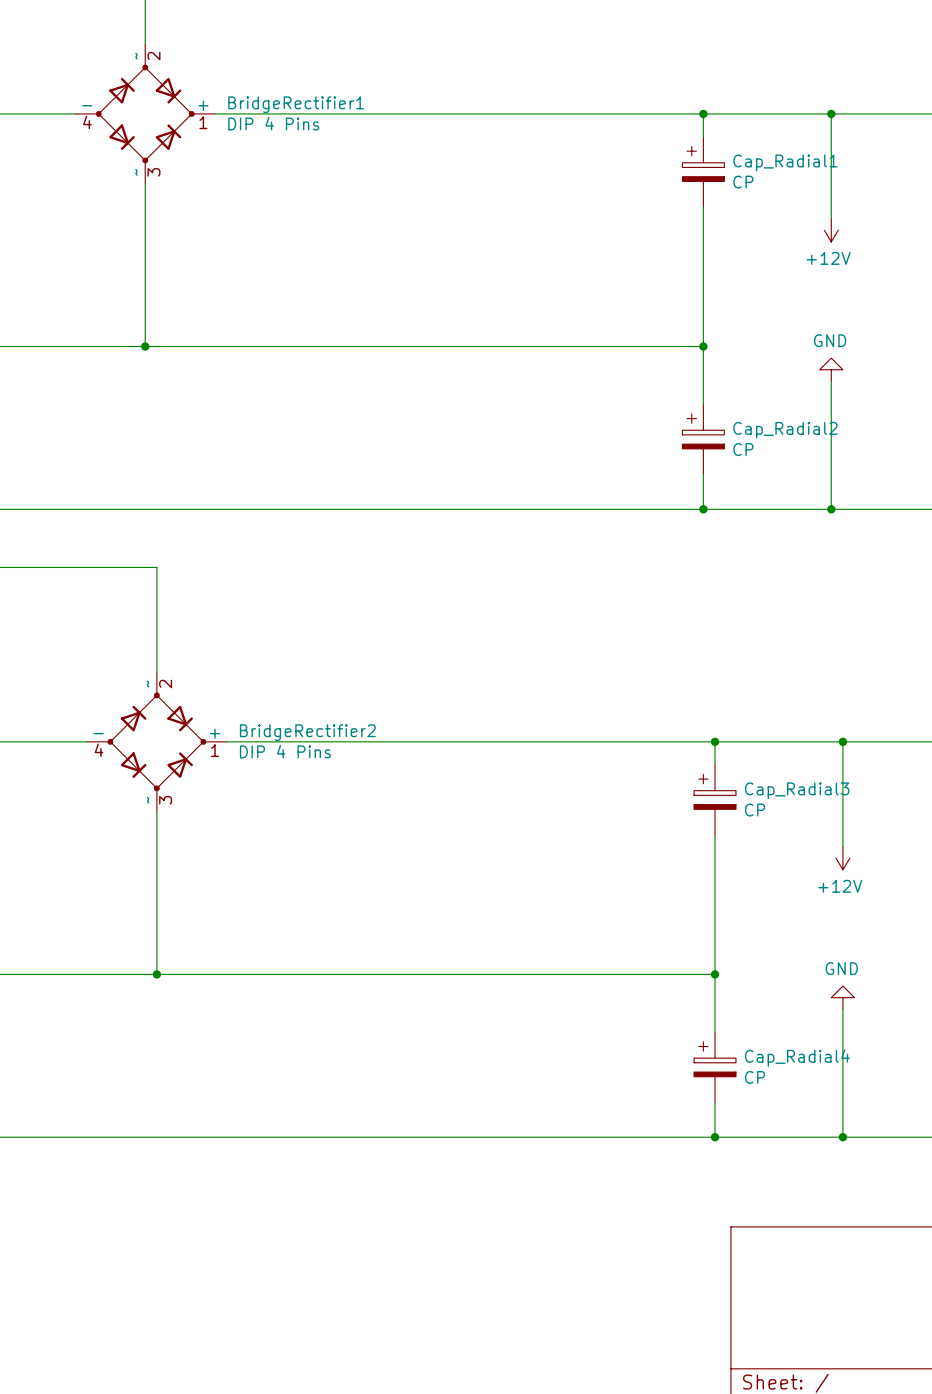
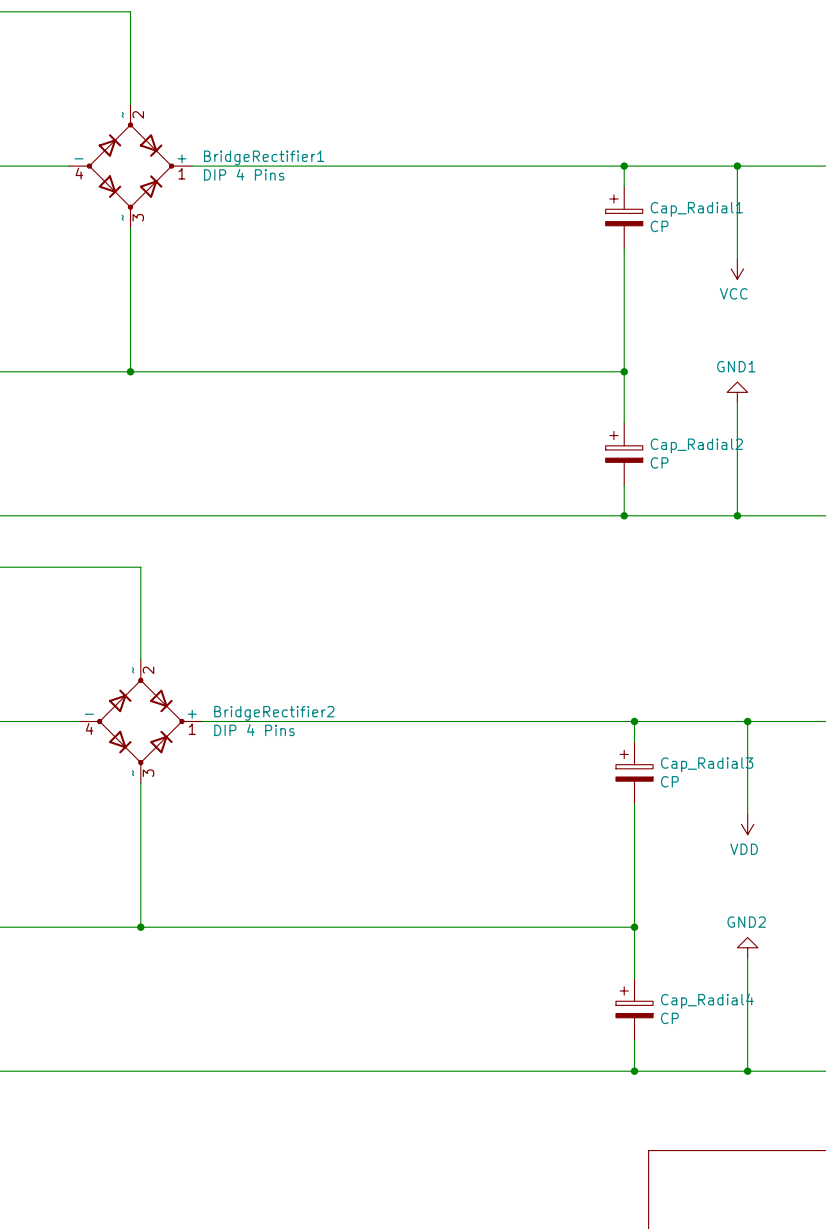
power symbol: +12V (831, 230) -> VCC (737, 268)
power symbol: GND (831, 369) -> GND1 (737, 392)
power symbol: +12V (842, 858) -> VDD (747, 824)
power symbol: GND (842, 997) -> GND2 (747, 947)

